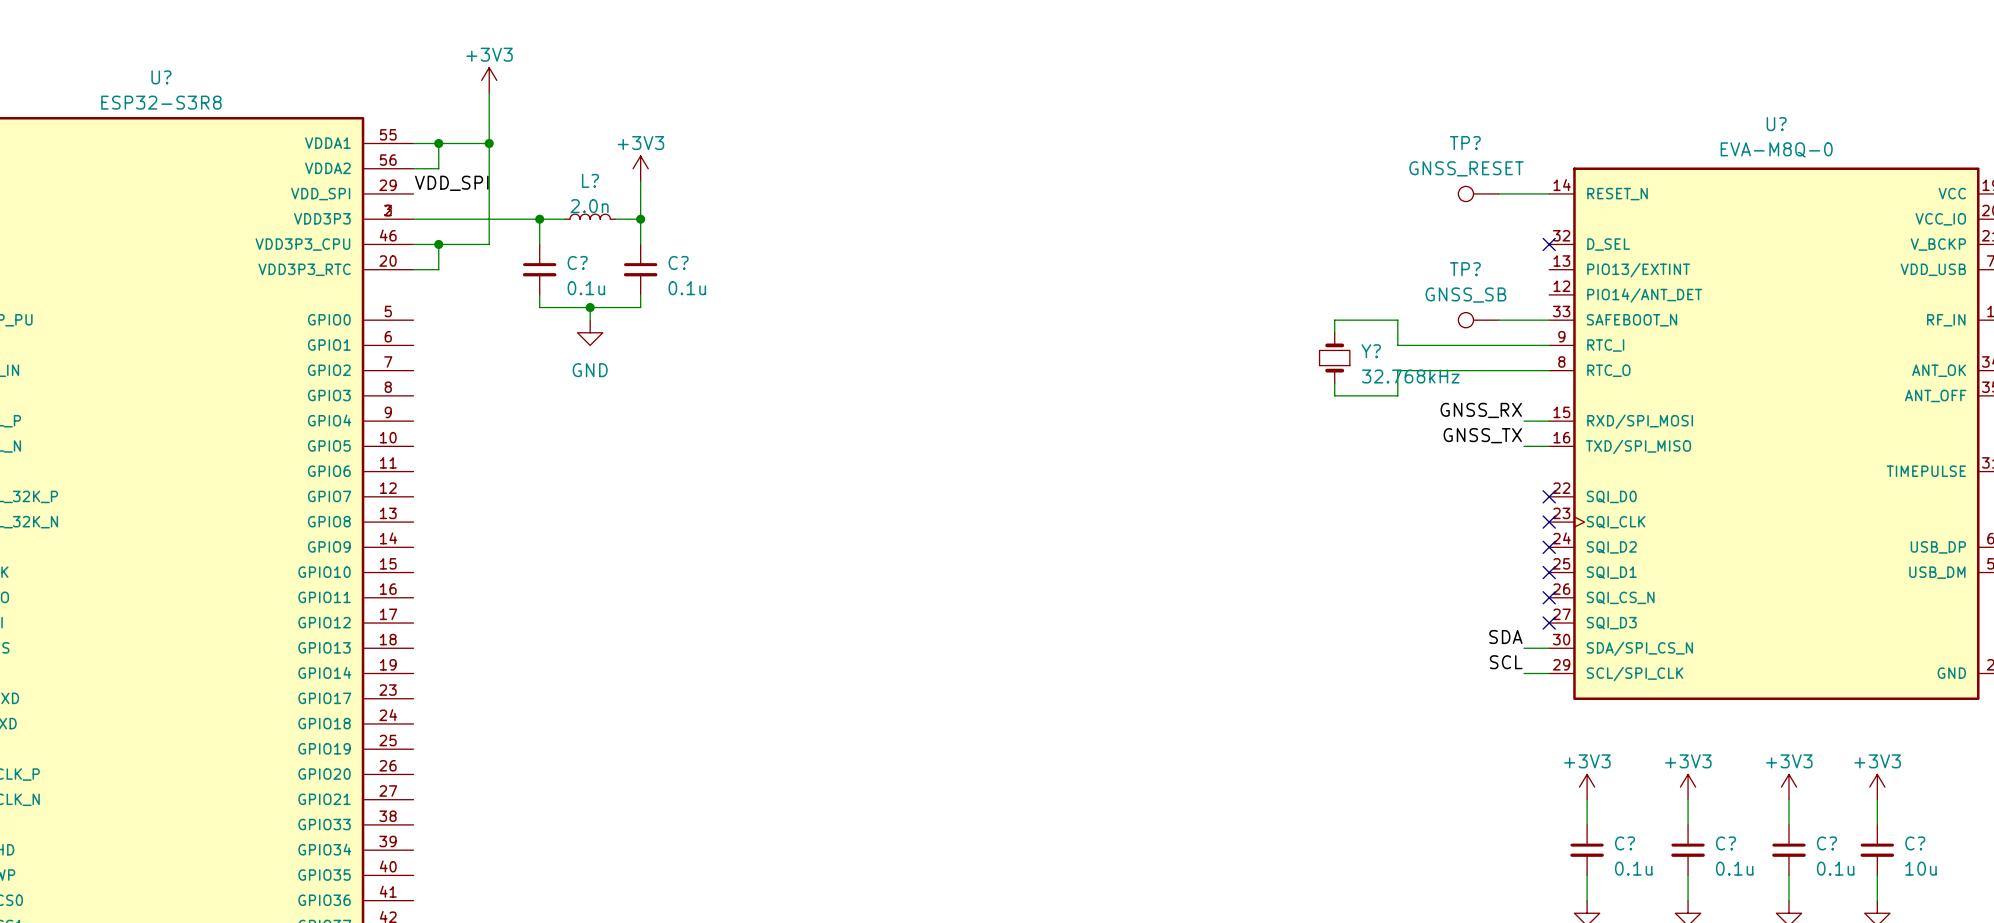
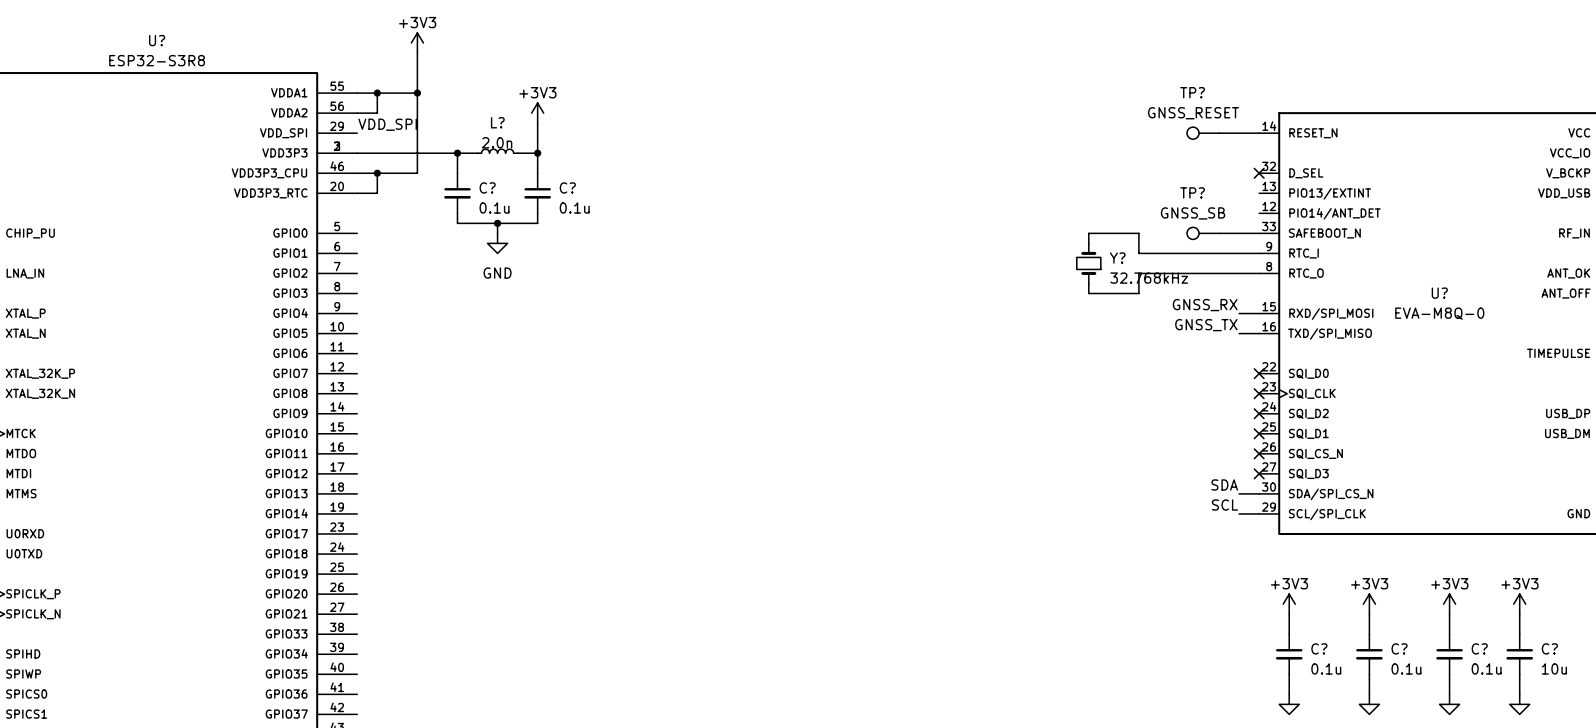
U? name position: U? (1776, 124) -> U? (1439, 293)
U? value position: EVA-M8Q-0 (1776, 149) -> EVA-M8Q-0 (1439, 313)

